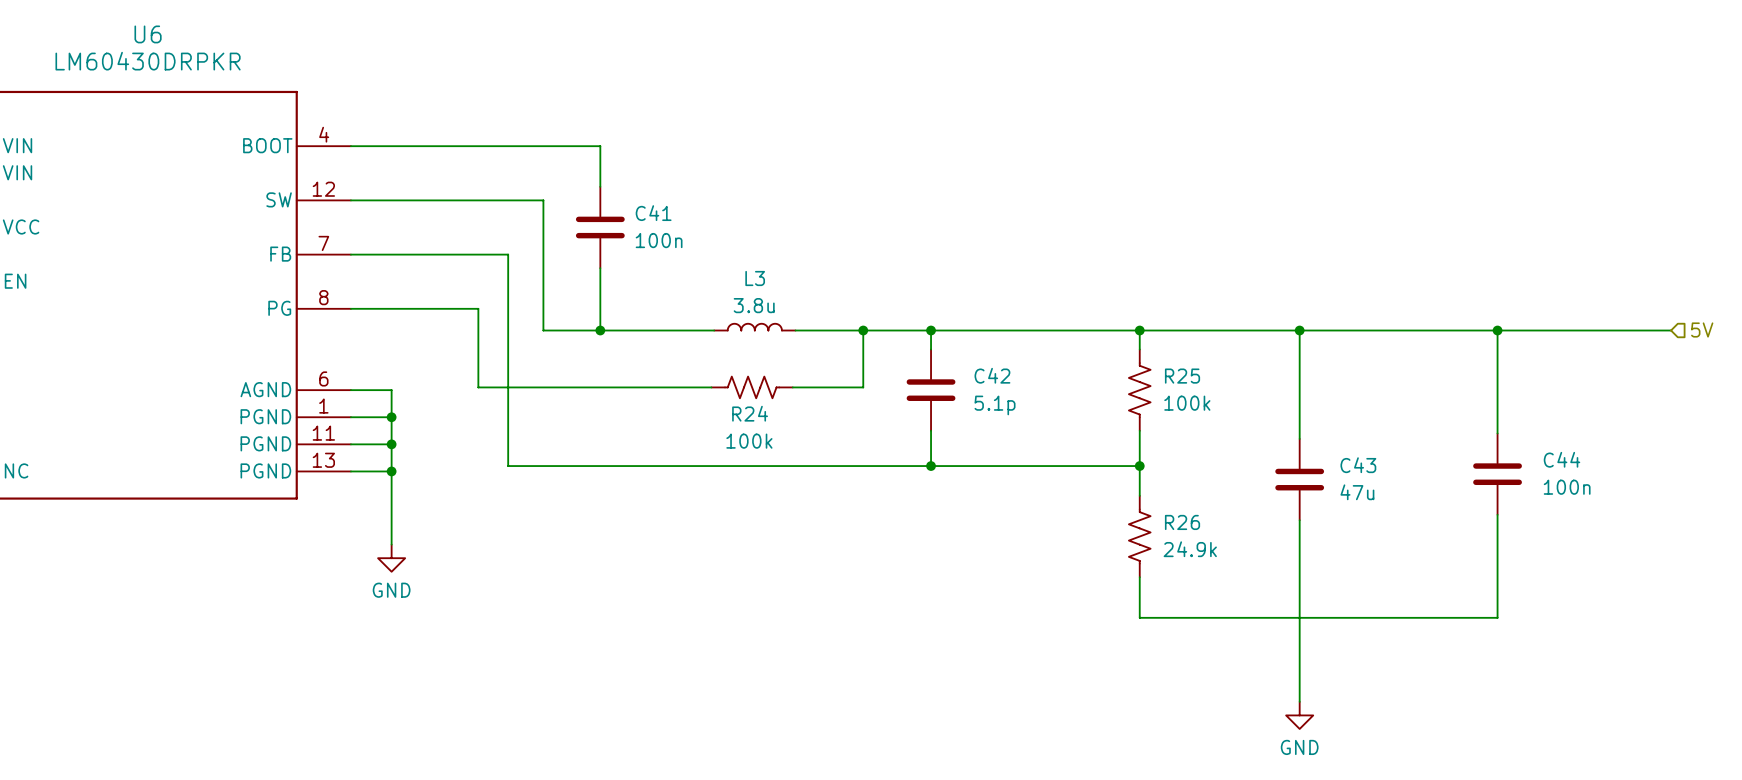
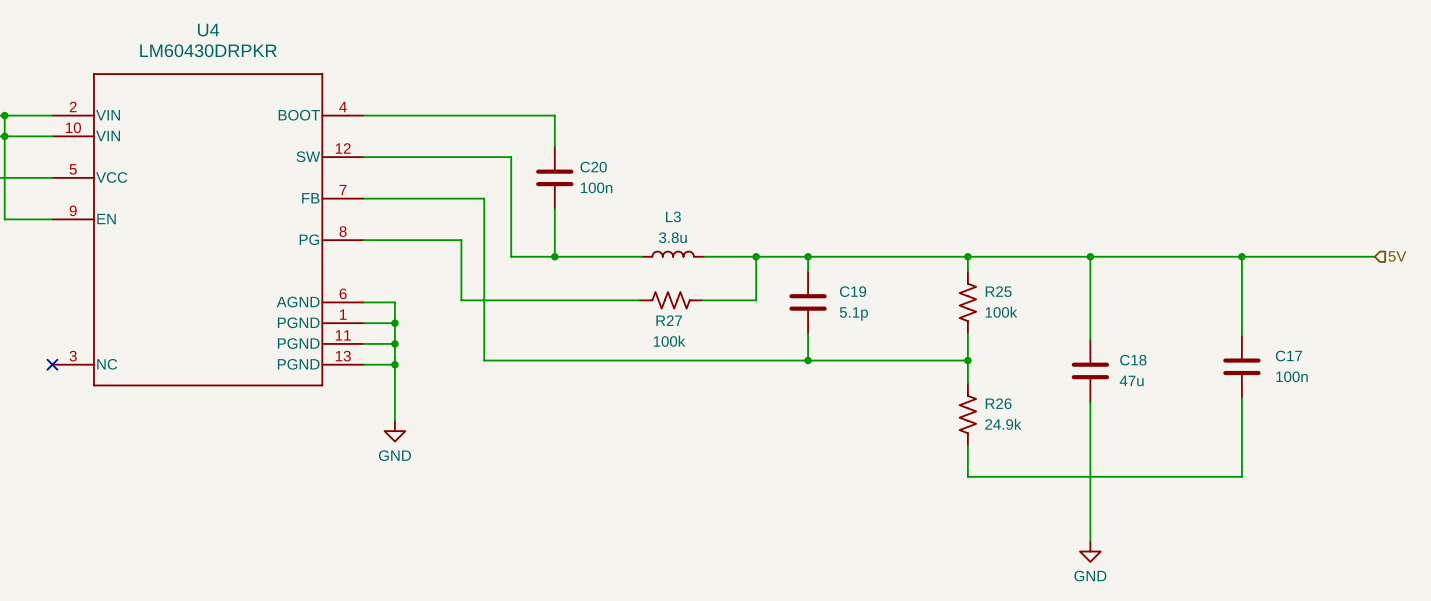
U6 name: U6 (148, 34) -> U4 (208, 30)
C41 name: C41 (653, 213) -> C20 (593, 167)
C42 name: C42 (992, 375) -> C19 (853, 291)
R24 name: R24 (750, 413) -> R27 (669, 320)
C44 name: C44 (1562, 459) -> C17 (1288, 356)
C43 name: C43 (1358, 465) -> C18 (1133, 360)

